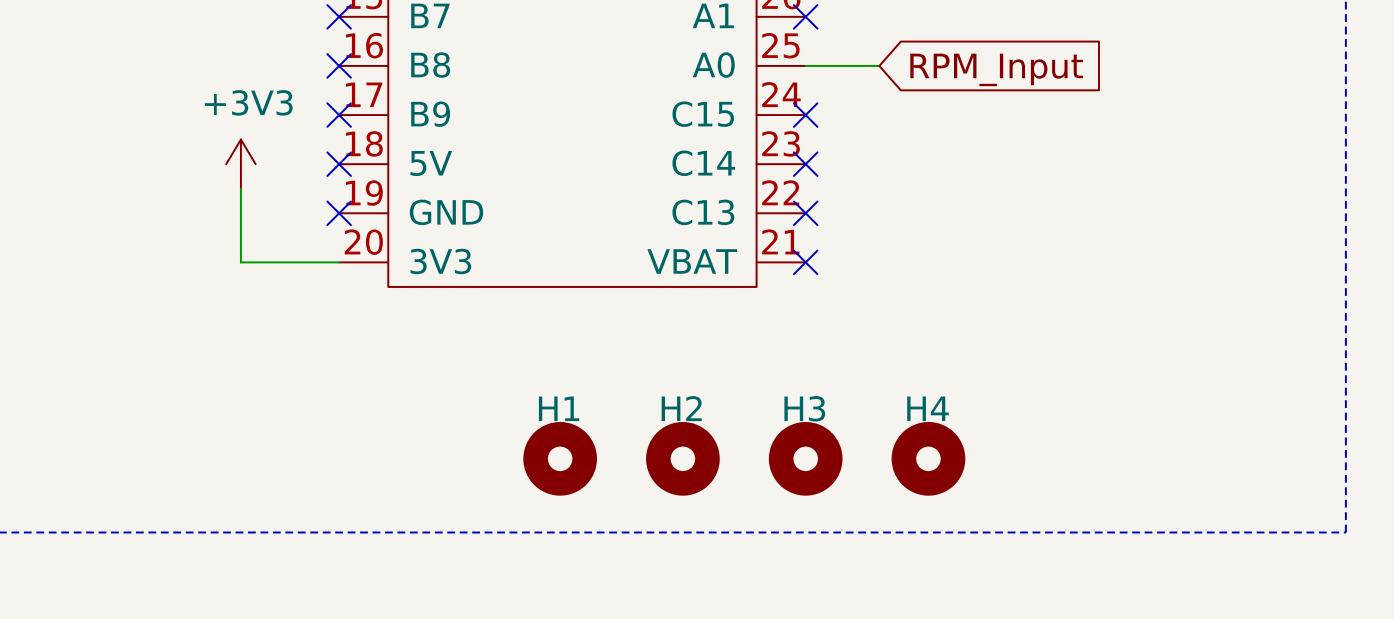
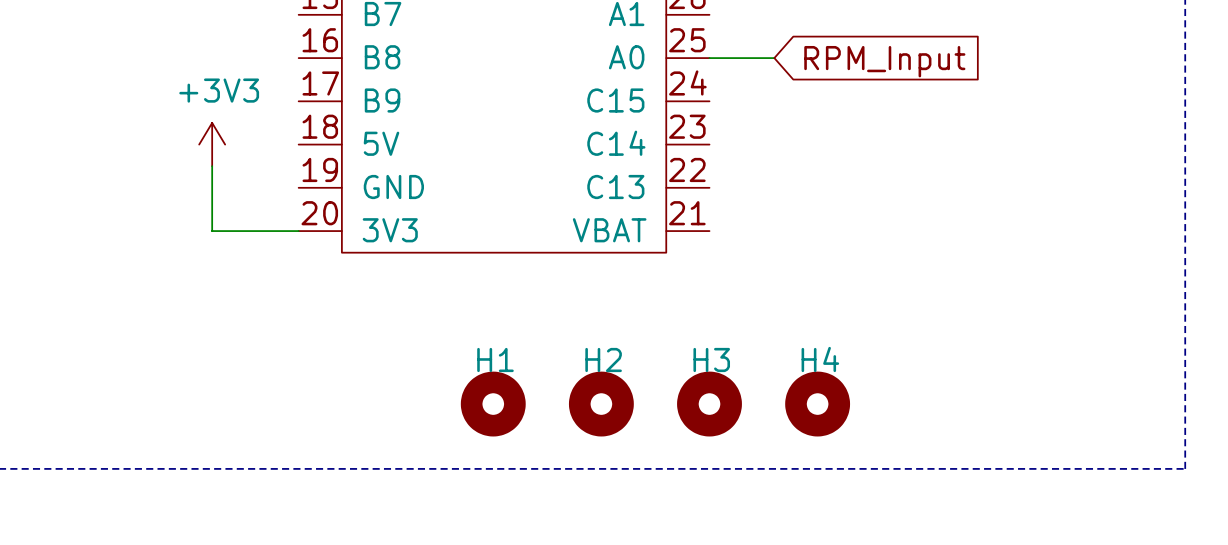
no-connect mark: (339, 16) -> none
no-connect mark: (805, 16) -> none
no-connect mark: (339, 65) -> none
no-connect mark: (339, 115) -> none
no-connect mark: (805, 115) -> none
no-connect mark: (339, 164) -> none
no-connect mark: (805, 164) -> none
no-connect mark: (339, 213) -> none
no-connect mark: (805, 213) -> none
no-connect mark: (805, 262) -> none

